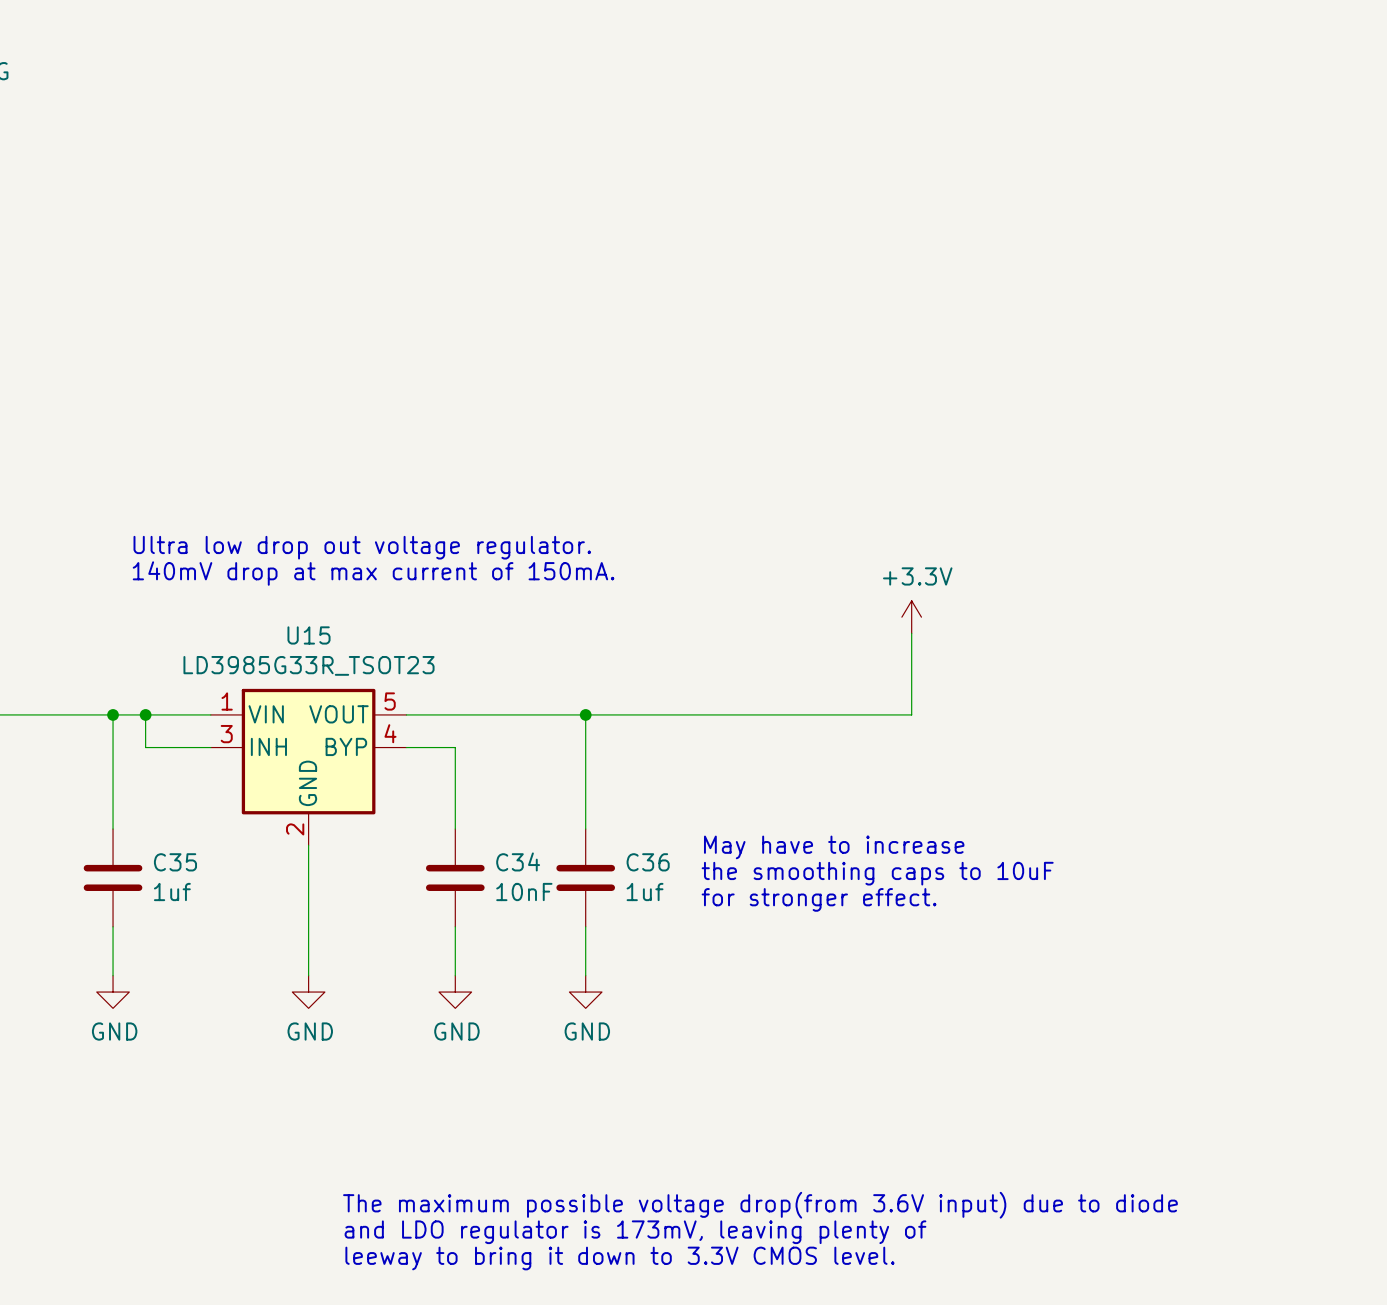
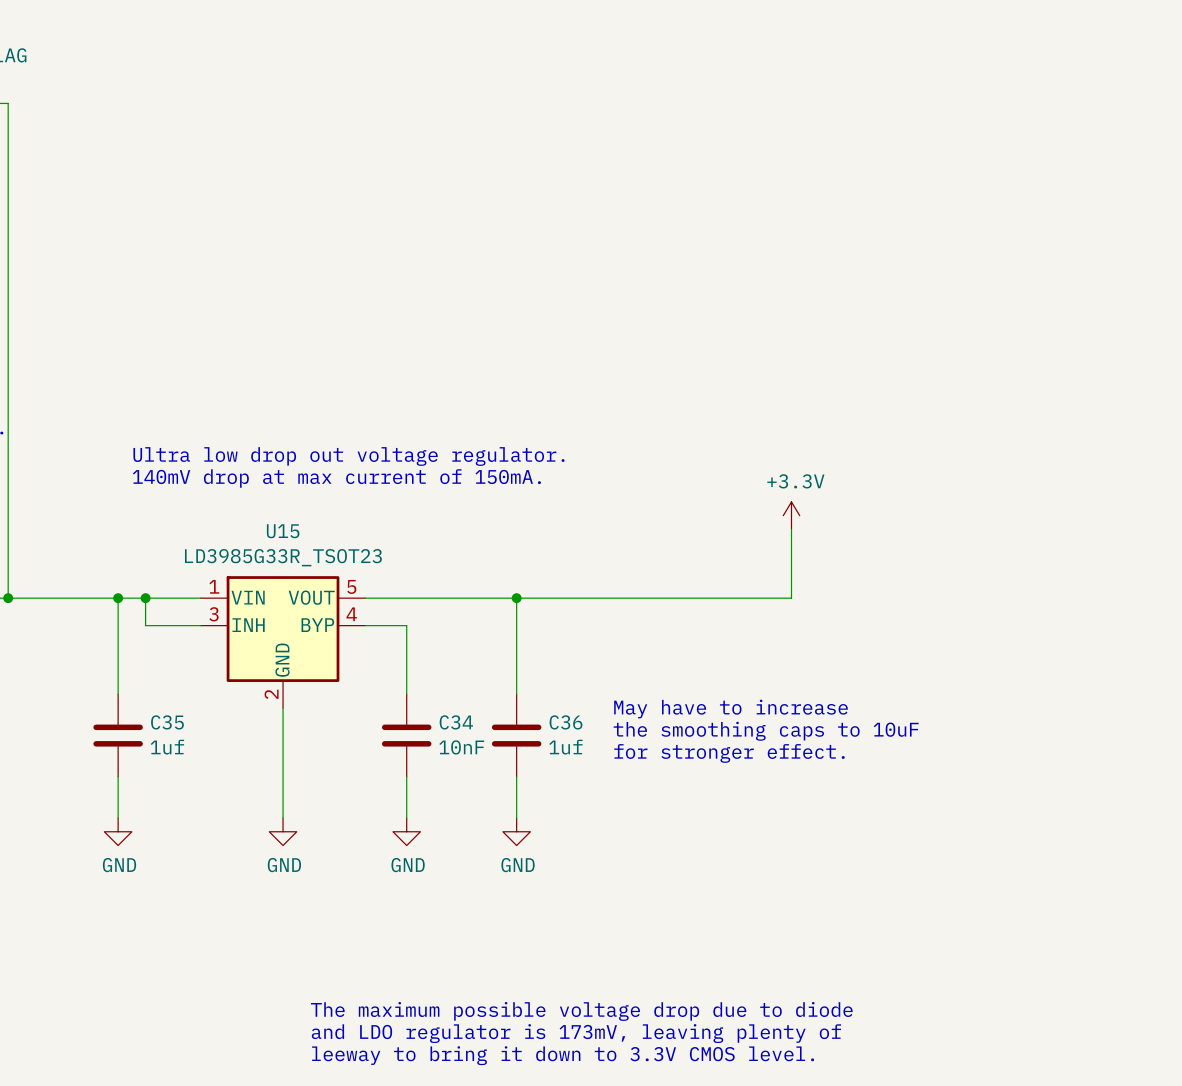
text: The maximum possible voltage drop(from 3.6V input) due to diode (760, 1205) -> The maximum possible voltage drop due to diode (581, 1011)

